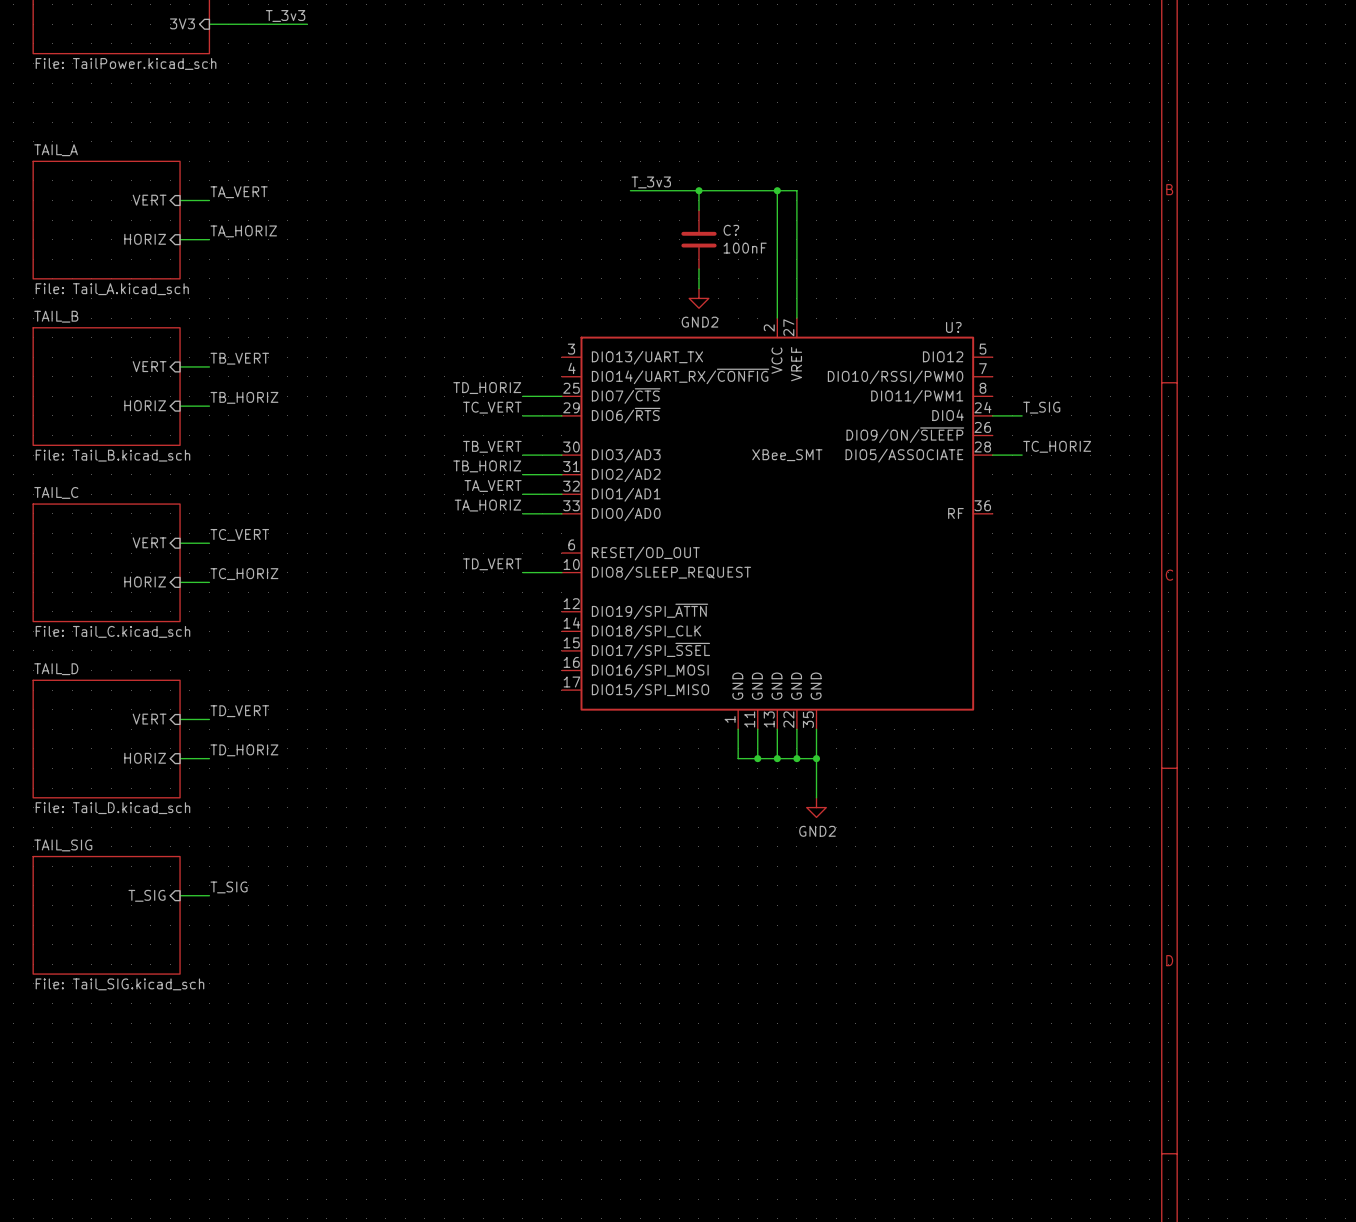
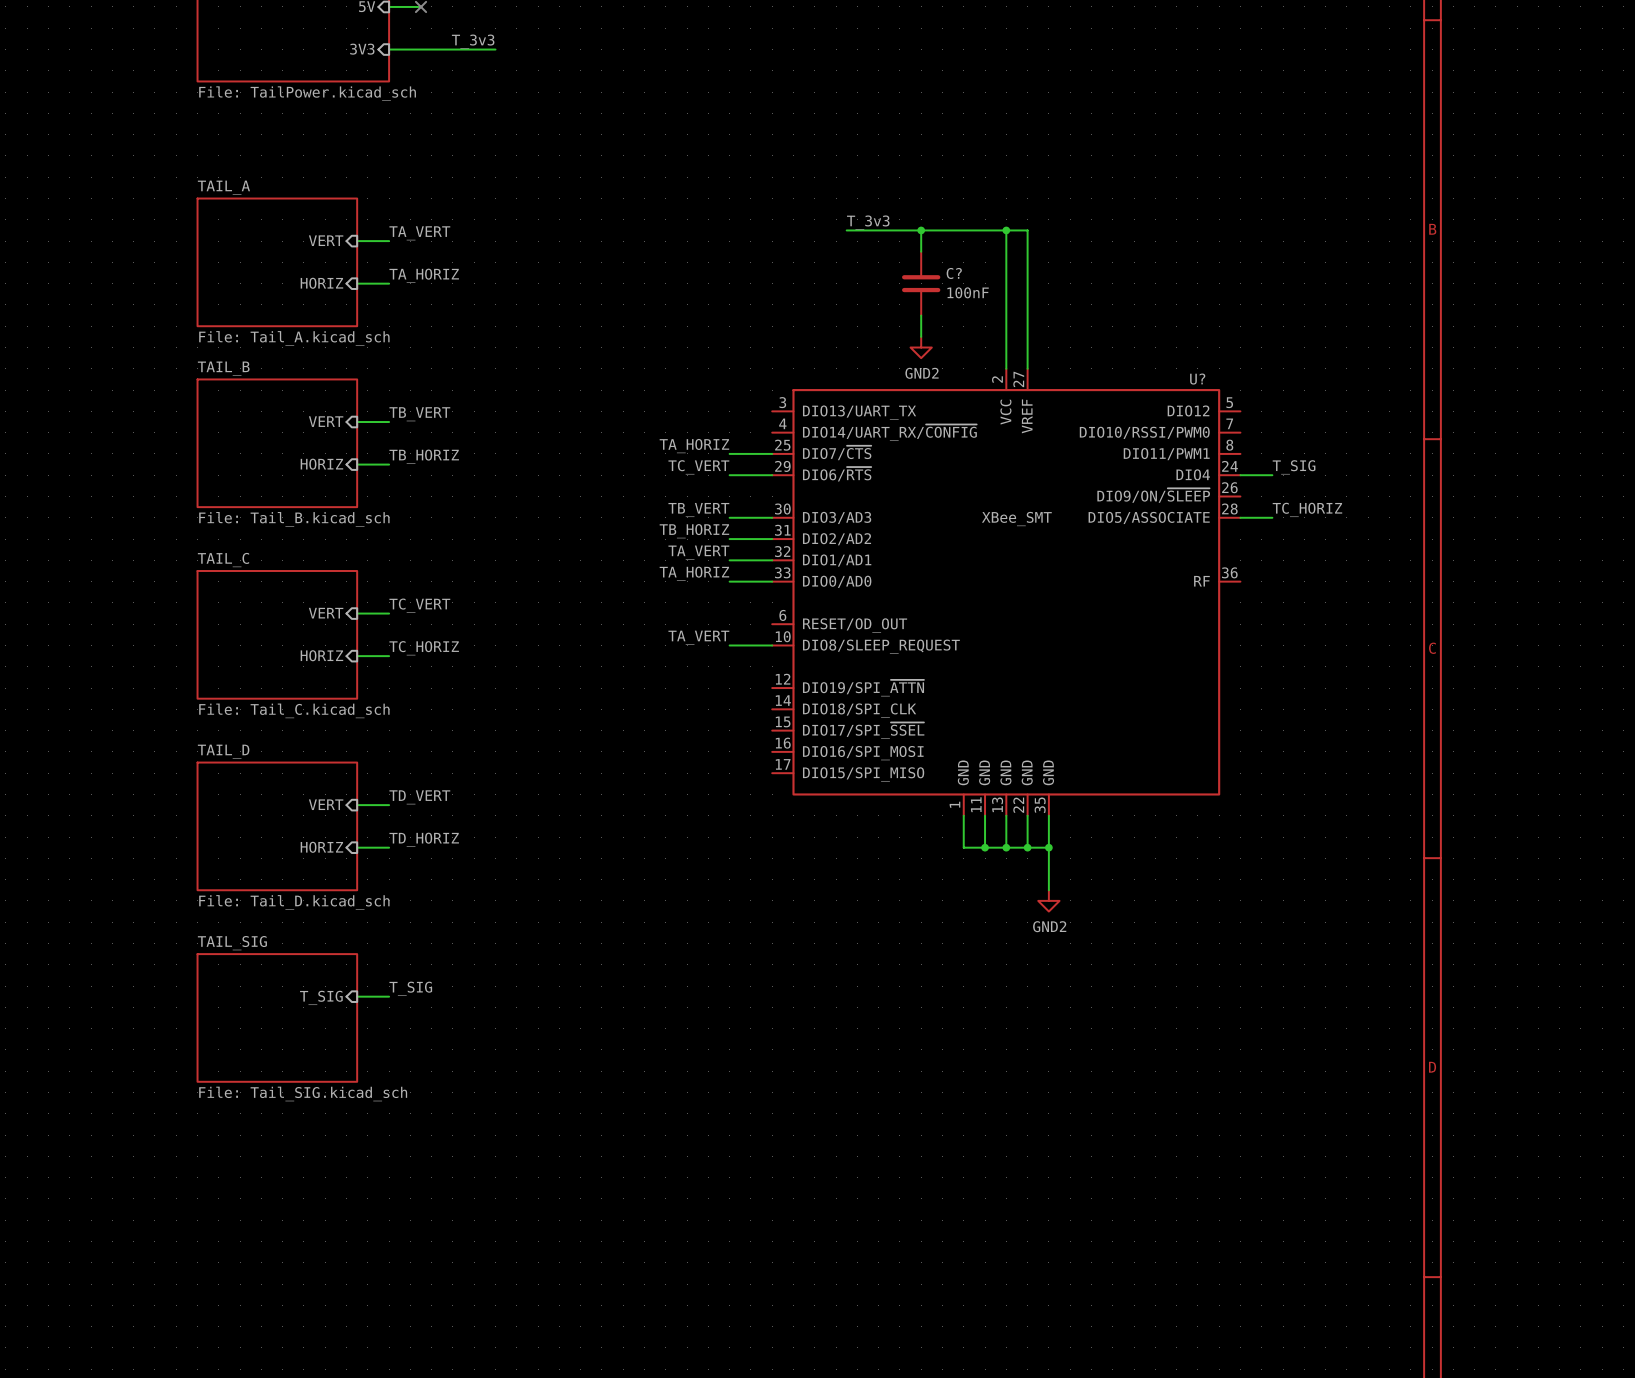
label: TD_HORIZ (487, 388) -> TA_HORIZ (694, 446)
label: TD_VERT (492, 564) -> TA_VERT (698, 637)

